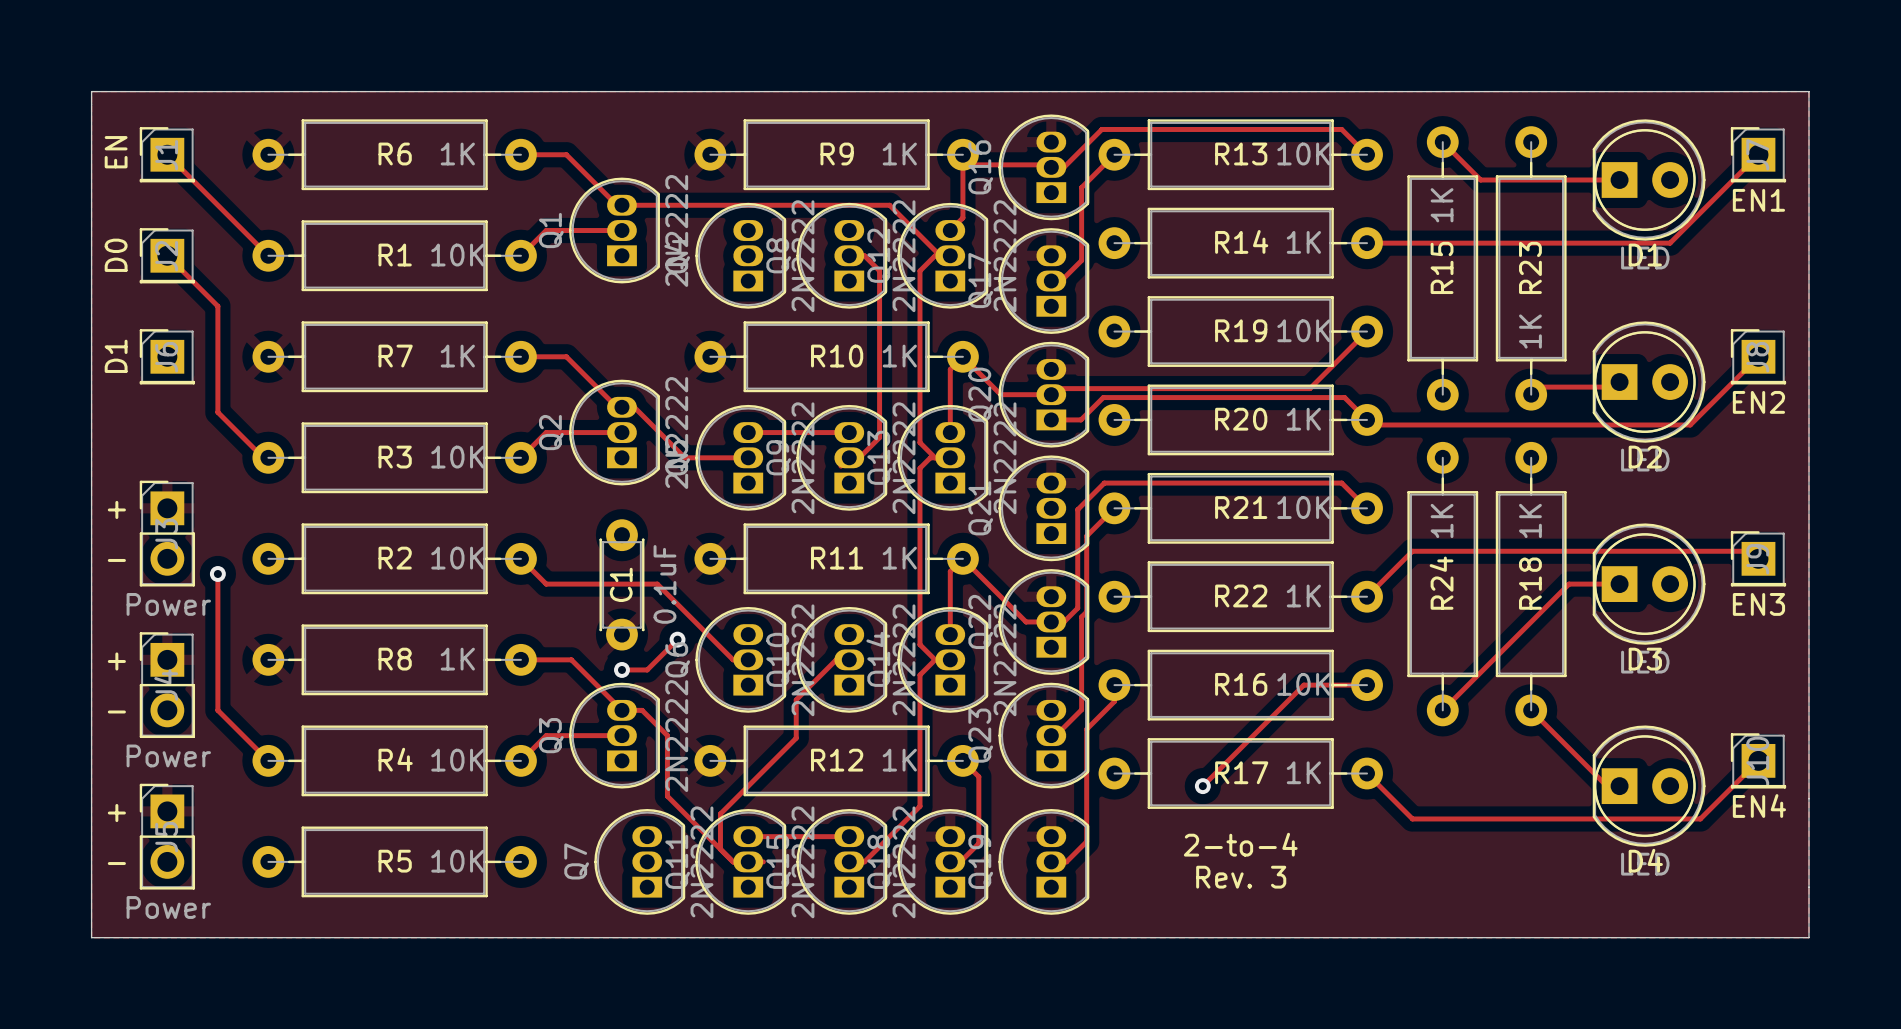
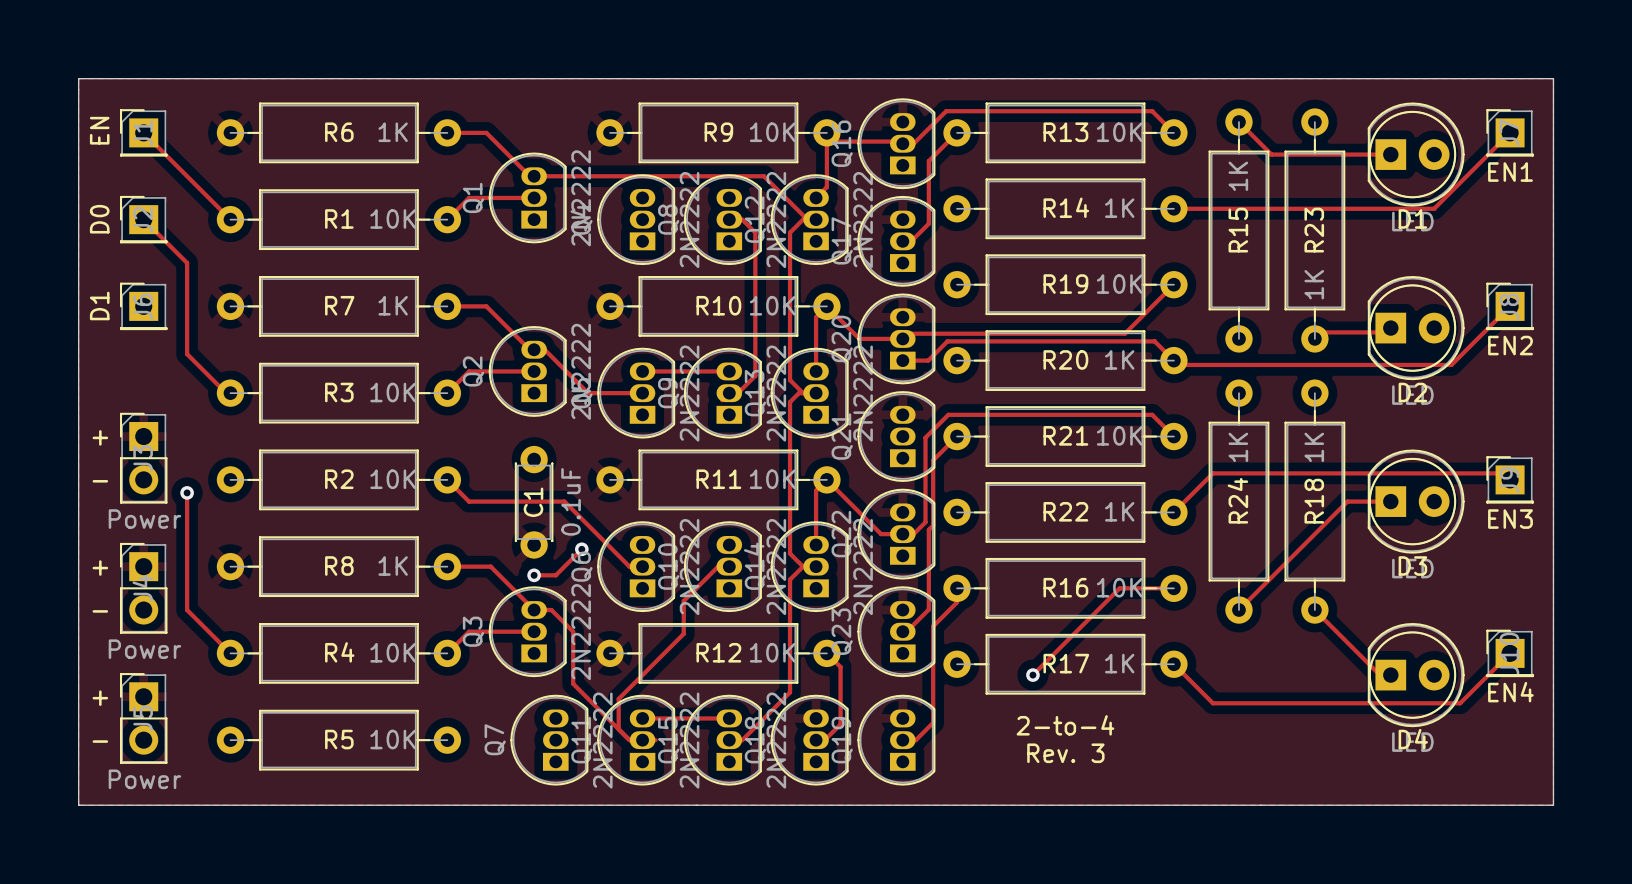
R9 value: 1K (899, 154) -> 10K (772, 132)
R10 value: 1K (899, 356) -> 10K (772, 305)
R11 value: 1K (899, 558) -> 10K (772, 479)
R12 value: 1K (899, 760) -> 10K (772, 652)

